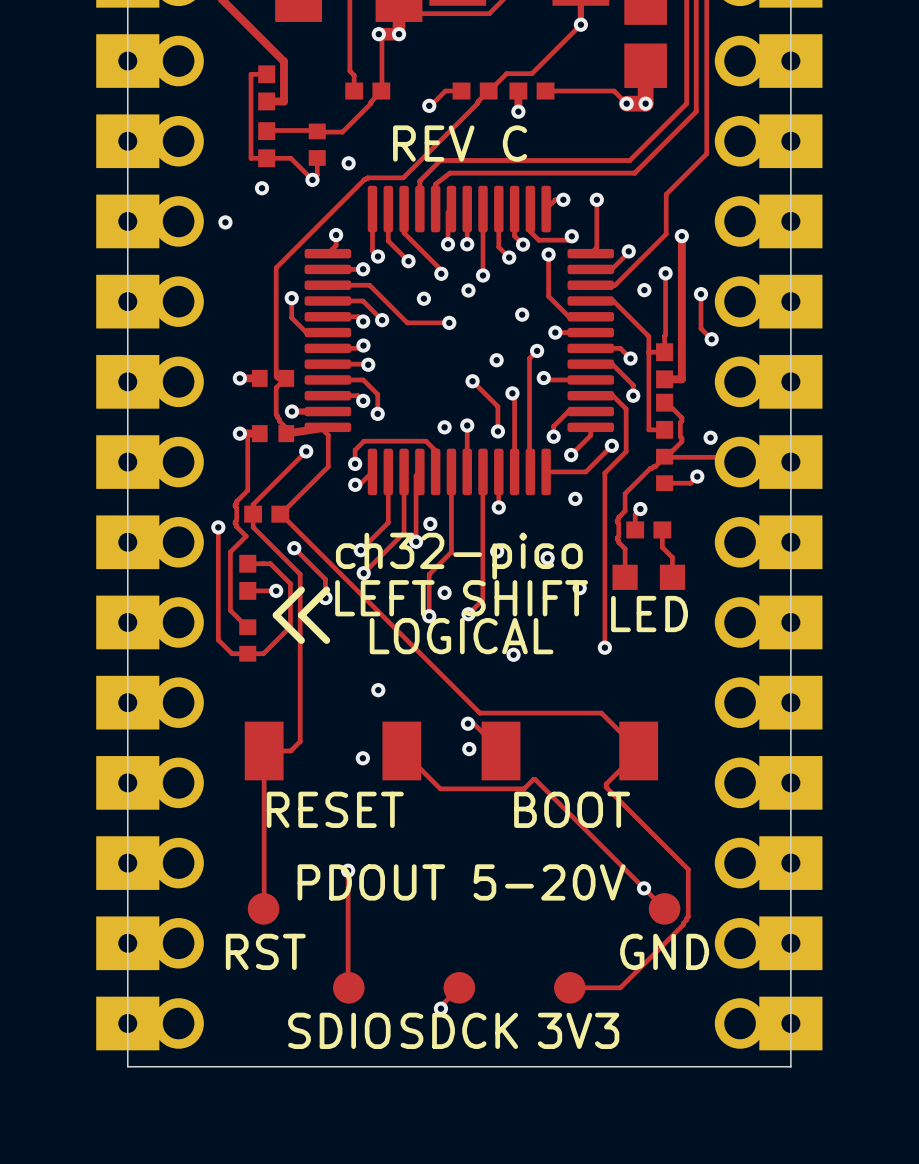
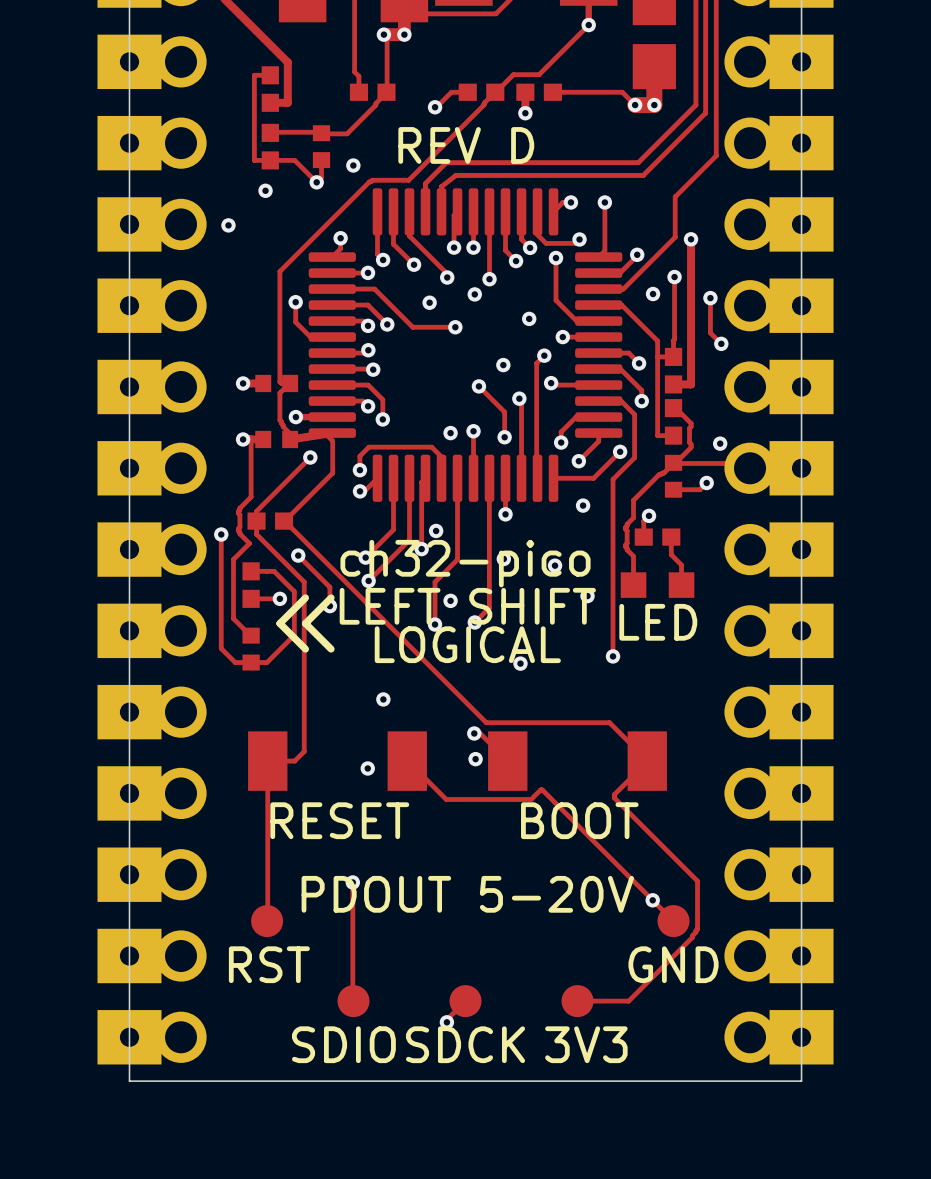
text: REV C (460, 143) -> REV D (466, 145)

